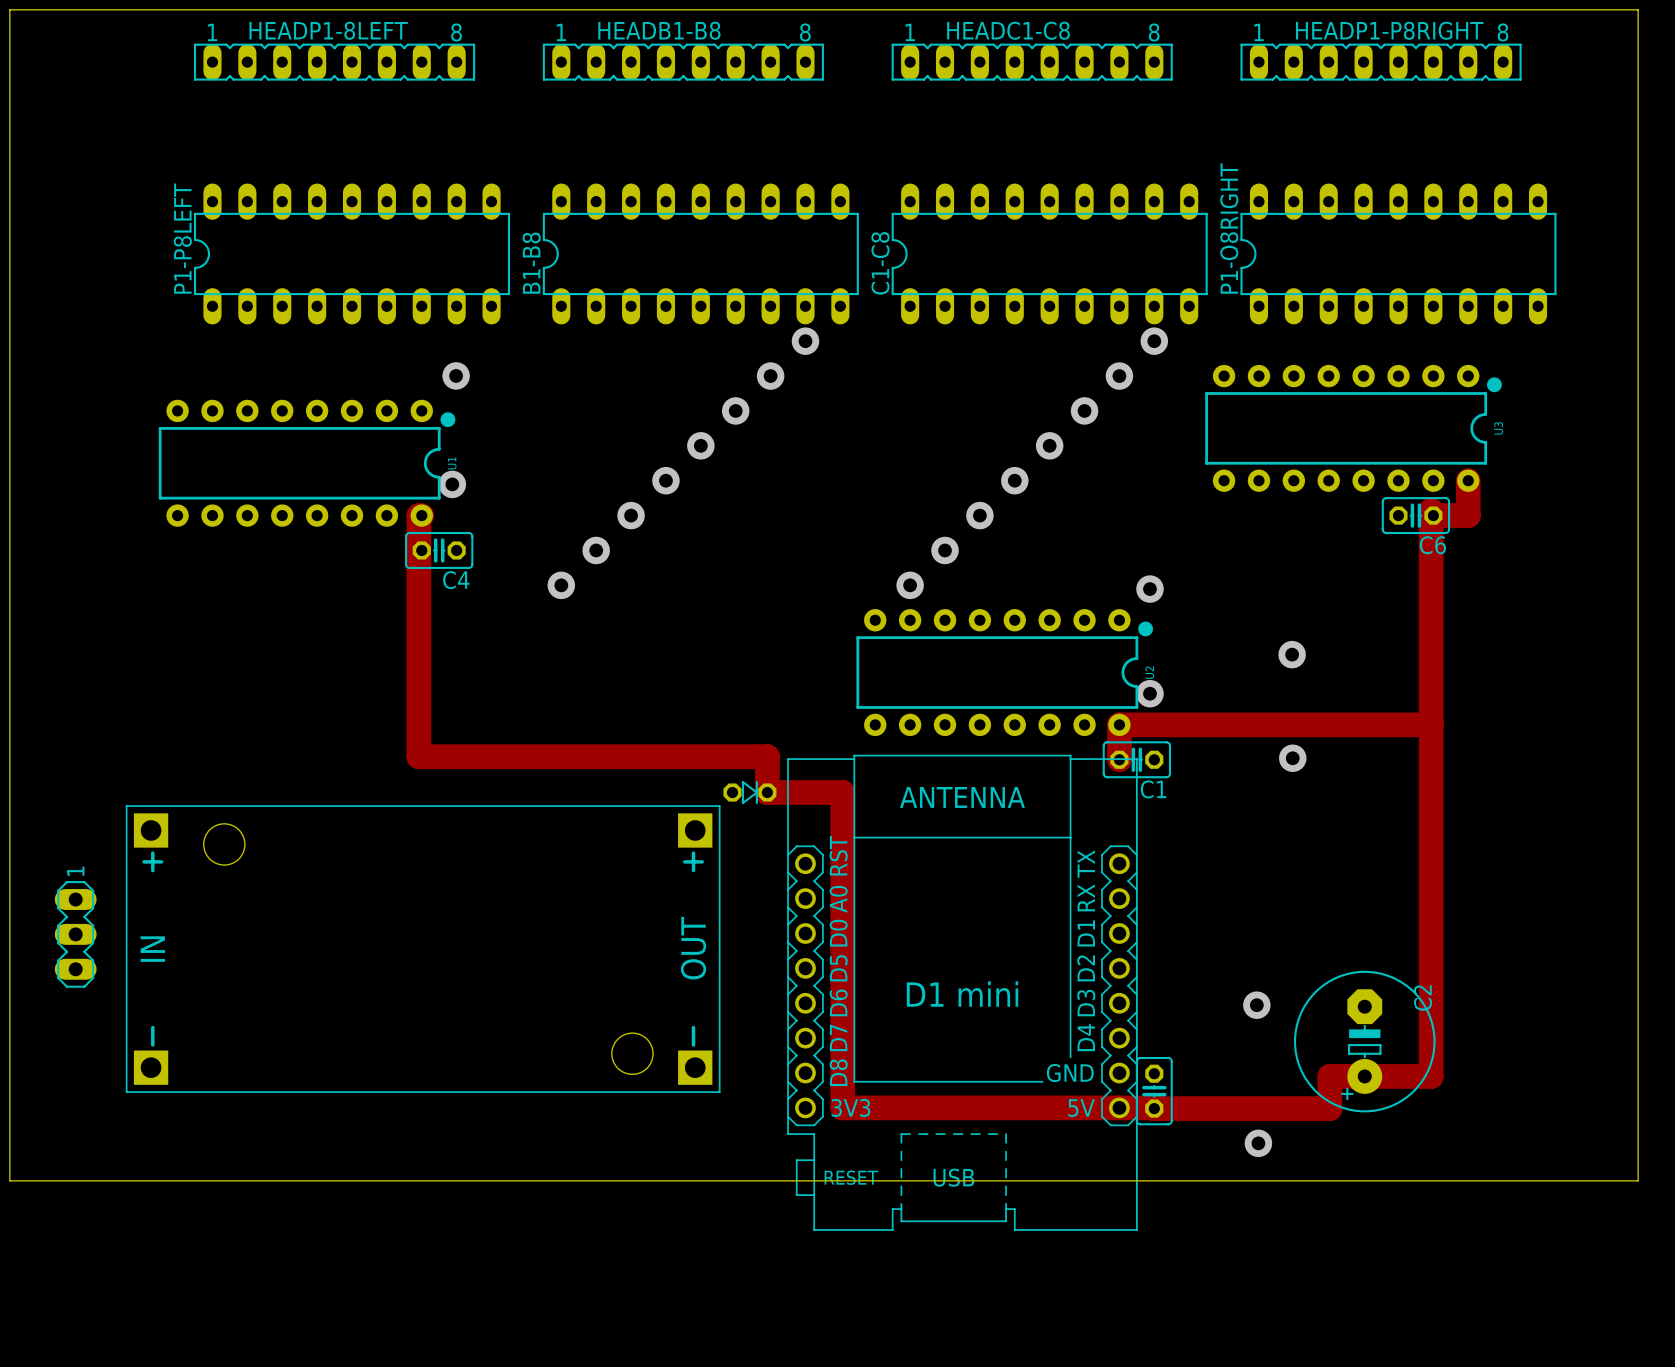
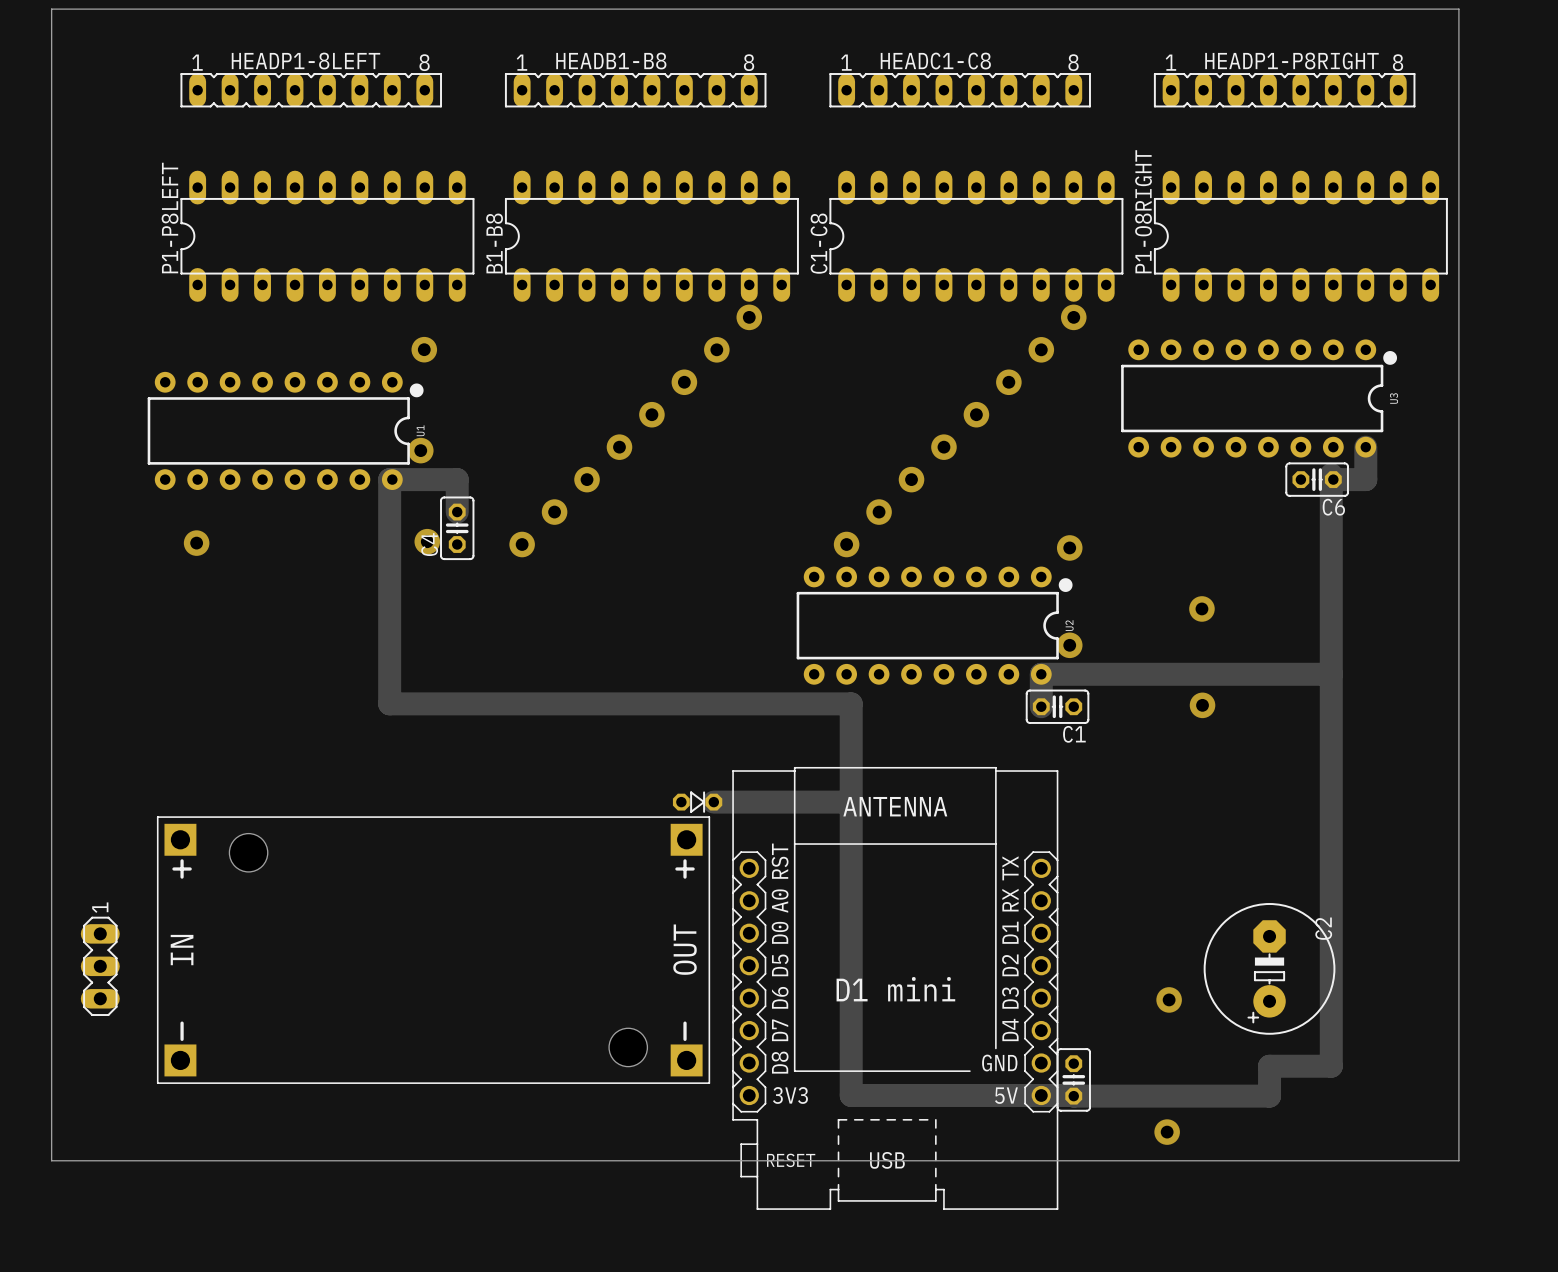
board edge: (55, 9) (9, 9) (9, 1180) (1638, 1180) (1638, 9) (1568, 9) -> (51, 9) (51, 1160) (1458, 1160) (1458, 9)
HEADP1-8LEFT position: (334, 62) -> (311, 90)
HEADB1-B8 position: (683, 62) -> (635, 90)
HEADC1-C8 position: (1032, 62) -> (960, 90)
HEADP1-P8RIGHT position: (1381, 62) -> (1284, 90)
track: none -> (392, 479) (457, 479) (457, 512)
C4 rotation: 0° (439, 550) -> 90° clockwise (457, 528)
C4 position: (439, 550) -> (457, 528)
via: none -> (427, 541)
via: none -> (196, 543)
track: (767, 756) (767, 792) (842, 792) (842, 1107) (1329, 1108) (1329, 1076) (1431, 1076) -> (713, 703) (851, 703) (851, 1095) (1269, 1096) (1269, 1066) (1331, 1066) (1331, 1001)
part position: (749, 792) -> (697, 802)
track: none -> (713, 802) (851, 802)
part position: (75, 934) -> (100, 966)
part position: (423, 949) -> (433, 950)
part position: (962, 992) -> (895, 988)
via: (1256, 1005) -> none
via: none -> (1169, 999)
part position: (1154, 1091) -> (1073, 1079)
via: (1258, 1143) -> none
via: none -> (1167, 1132)

